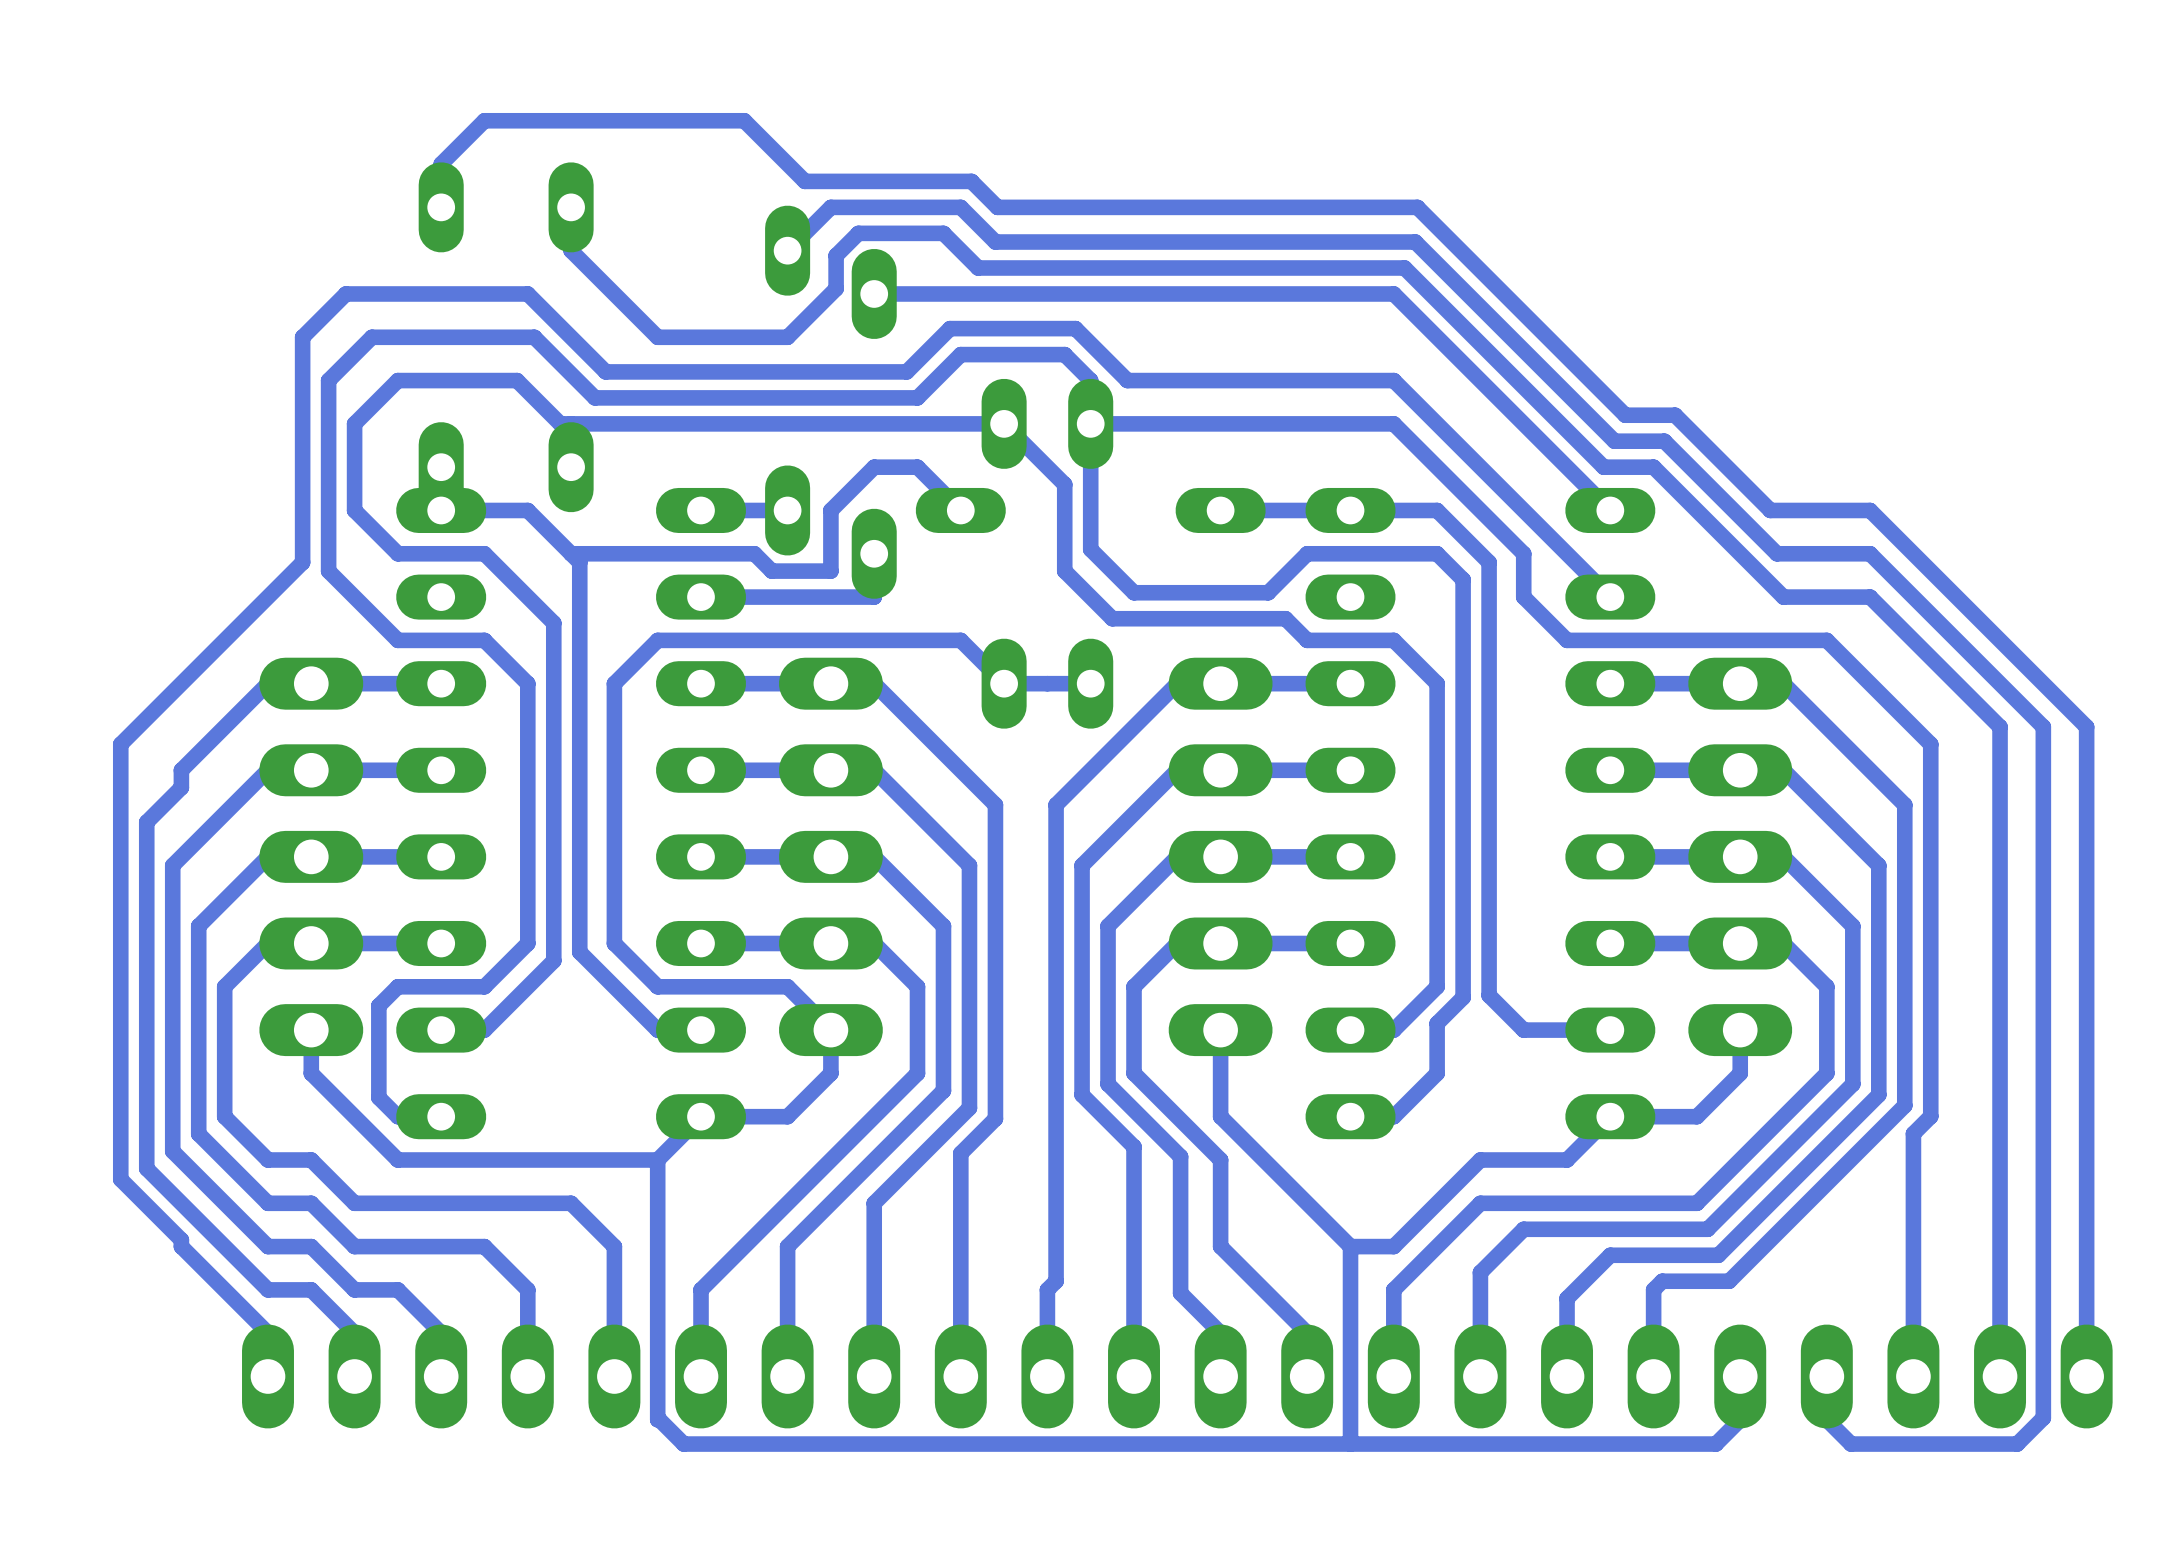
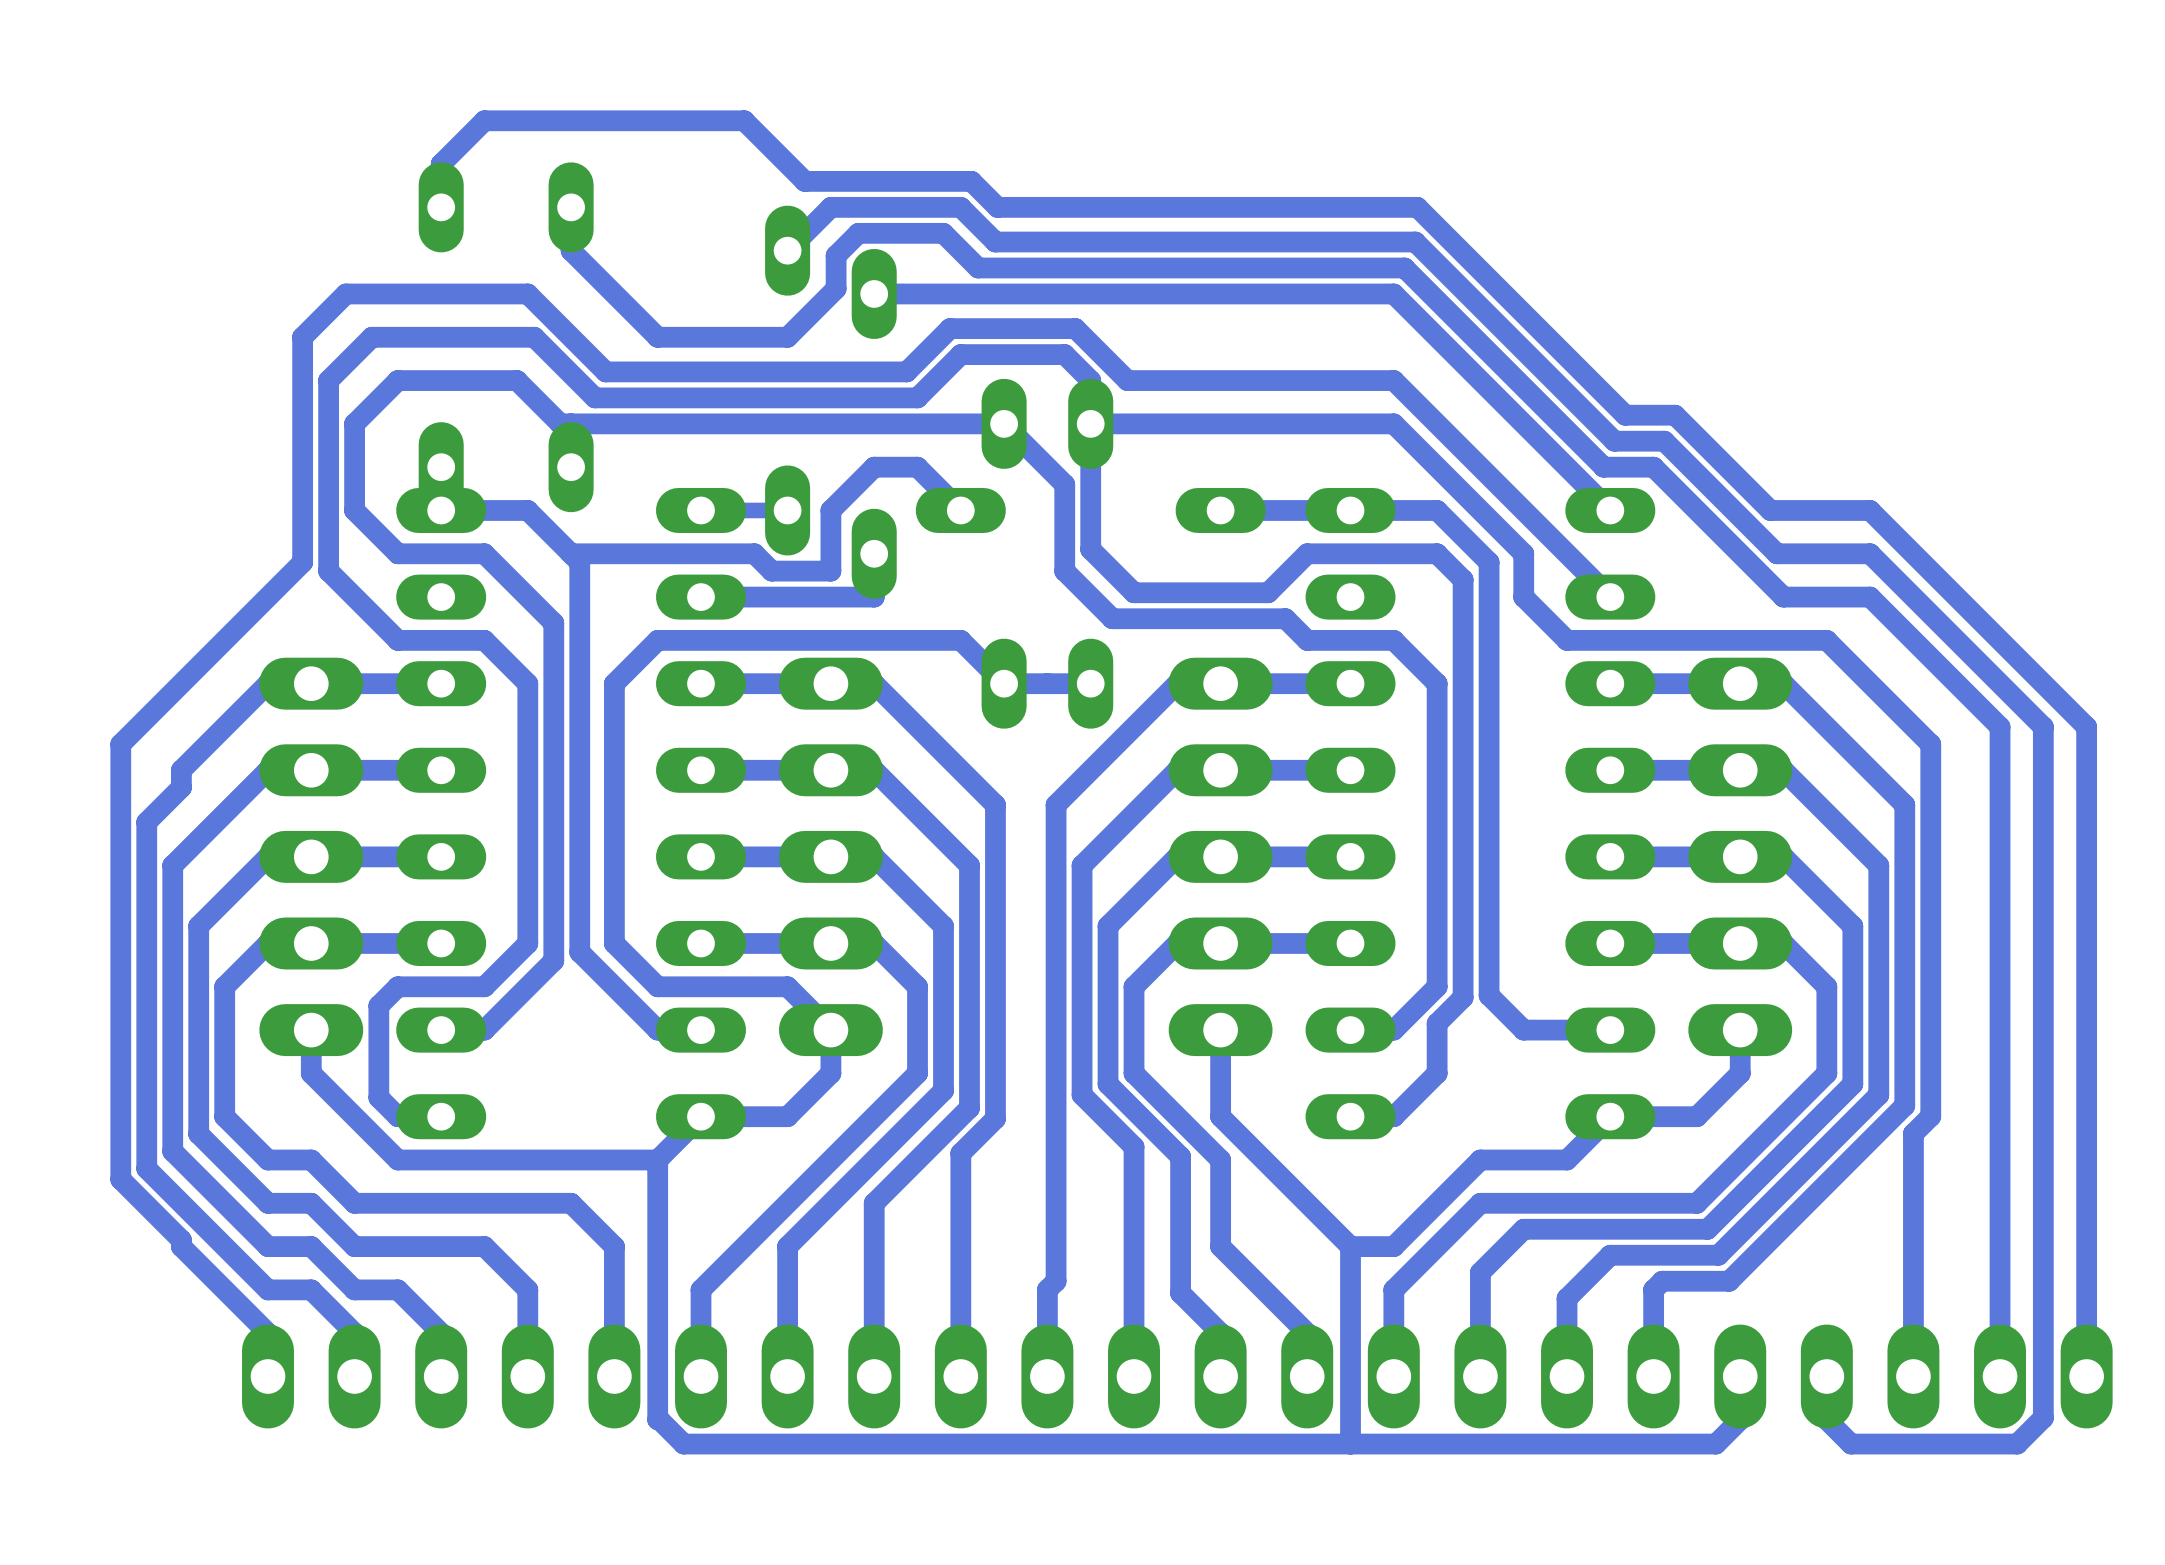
track width: thin (441, 207) (441, 164) (484, 120) (744, 120) (804, 181) (971, 181) (997, 207) (1417, 207) (1625, 415) (1675, 415) (1770, 510) (1870, 510) (2086, 726) (2086, 1376) -> thick (441, 207) (441, 164) (484, 120) (744, 120) (804, 181) (971, 181) (997, 207) (1417, 207) (1625, 415) (1675, 415) (1770, 510) (1870, 510) (2086, 726) (2086, 1376)
track width: thin (571, 207) (571, 250) (657, 337) (787, 337) (836, 288) (836, 255) (858, 233) (943, 233) (978, 267) (1404, 267) (1603, 467) (1653, 467) (1783, 597) (1870, 597) (2000, 726) (2000, 1376) -> thick (571, 207) (571, 250) (657, 337) (787, 337) (836, 288) (836, 255) (858, 233) (943, 233) (978, 267) (1404, 267) (1603, 467) (1653, 467) (1783, 597) (1870, 597) (2000, 726) (2000, 1376)
track width: thin (787, 250) (830, 207) (960, 207) (995, 242) (1415, 242) (1614, 441) (1664, 441) (1776, 553) (1870, 553) (2043, 726) (2043, 1417) (2017, 1444) (1851, 1444) (1826, 1419) (1826, 1376) -> thick (787, 250) (830, 207) (960, 207) (995, 242) (1415, 242) (1614, 441) (1664, 441) (1776, 553) (1870, 553) (2043, 726) (2043, 1417) (2017, 1444) (1851, 1444) (1826, 1419) (1826, 1376)
track width: thin (874, 293) (1393, 293) (1610, 510) -> thick (874, 293) (1393, 293) (1610, 510)
track width: thin (1090, 423) (1393, 423) (1523, 553) (1523, 597) (1567, 640) (1826, 640) (1930, 744) (1930, 1116) (1913, 1133) (1913, 1376) -> thick (1090, 423) (1393, 423) (1523, 553) (1523, 597) (1567, 640) (1826, 640) (1930, 744) (1930, 1116) (1913, 1133) (1913, 1376)
track width: thin (441, 467) (441, 510) (527, 510) (579, 562) (579, 952) (657, 1030) (701, 1030) -> thick (441, 467) (441, 510) (527, 510) (579, 562) (579, 952) (657, 1030) (701, 1030)
track width: thin (960, 510) (917, 467) (874, 467) (830, 510) (830, 571) (771, 571) (754, 553) (571, 553) -> thick (960, 510) (917, 467) (874, 467) (830, 510) (830, 571) (771, 571) (754, 553) (571, 553)
track width: thin (1220, 510) (1437, 510) (1489, 562) (1489, 995) (1523, 1030) (1610, 1030) -> thick (1220, 510) (1437, 510) (1489, 562) (1489, 995) (1523, 1030) (1610, 1030)
track width: thin (874, 553) (874, 597) (701, 597) -> thick (874, 553) (874, 597) (701, 597)
track width: thin (1610, 597) (1393, 380) (1127, 380) (1075, 328) (950, 328) (906, 371) (605, 371) (527, 293) (345, 293) (302, 337) (302, 562) (120, 744) (120, 1179) (181, 1240) (181, 1246) (267, 1333) (267, 1376) -> thick (1610, 597) (1393, 380) (1127, 380) (1075, 328) (950, 328) (906, 371) (605, 371) (527, 293) (345, 293) (302, 337) (302, 562) (120, 744) (120, 1179) (181, 1240) (181, 1246) (267, 1333) (267, 1376)
track width: thin (441, 683) (267, 683) (181, 770) (181, 787) (146, 822) (146, 1168) (267, 1289) (311, 1289) (354, 1333) (354, 1376) -> thick (441, 683) (267, 683) (181, 770) (181, 787) (146, 822) (146, 1168) (267, 1289) (311, 1289) (354, 1333) (354, 1376)
track width: thin (701, 683) (874, 683) (995, 804) (995, 1118) (960, 1153) (960, 1376) -> thick (701, 683) (874, 683) (995, 804) (995, 1118) (960, 1153) (960, 1376)
track width: thin (1090, 683) (1004, 683) (960, 640) (657, 640) (614, 683) (614, 943) (657, 986) (787, 986) (830, 1030) (830, 1073) (787, 1116) (701, 1116) (657, 1159) -> thick (1090, 683) (1004, 683) (960, 640) (657, 640) (614, 683) (614, 943) (657, 986) (787, 986) (830, 1030) (830, 1073) (787, 1116) (701, 1116) (657, 1159)
track width: thin (1350, 683) (1177, 683) (1056, 804) (1056, 1281) (1047, 1289) (1047, 1376) -> thick (1350, 683) (1177, 683) (1056, 804) (1056, 1281) (1047, 1289) (1047, 1376)
track width: thin (1610, 683) (1783, 683) (1904, 804) (1904, 1105) (1729, 1281) (1662, 1281) (1653, 1289) (1653, 1376) -> thick (1610, 683) (1783, 683) (1904, 804) (1904, 1105) (1729, 1281) (1662, 1281) (1653, 1289) (1653, 1376)
track width: thin (441, 770) (267, 770) (172, 865) (172, 1151) (267, 1246) (311, 1246) (354, 1289) (397, 1289) (441, 1333) (441, 1376) -> thick (441, 770) (267, 770) (172, 865) (172, 1151) (267, 1246) (311, 1246) (354, 1289) (397, 1289) (441, 1333) (441, 1376)
track width: thin (701, 770) (874, 770) (969, 865) (969, 1108) (874, 1203) (874, 1376) -> thick (701, 770) (874, 770) (969, 865) (969, 1108) (874, 1203) (874, 1376)
track width: thin (1350, 770) (1177, 770) (1082, 865) (1082, 1094) (1134, 1146) (1134, 1376) -> thick (1350, 770) (1177, 770) (1082, 865) (1082, 1094) (1134, 1146) (1134, 1376)
track width: thin (1610, 770) (1783, 770) (1878, 865) (1878, 1094) (1718, 1255) (1610, 1255) (1567, 1298) (1567, 1376) -> thick (1610, 770) (1783, 770) (1878, 865) (1878, 1094) (1718, 1255) (1610, 1255) (1567, 1298) (1567, 1376)
track width: thin (441, 856) (267, 856) (198, 926) (198, 1134) (267, 1203) (311, 1203) (354, 1246) (484, 1246) (527, 1289) (527, 1376) -> thick (441, 856) (267, 856) (198, 926) (198, 1134) (267, 1203) (311, 1203) (354, 1246) (484, 1246) (527, 1289) (527, 1376)
track width: thin (701, 856) (874, 856) (943, 926) (943, 1090) (787, 1246) (787, 1376) -> thick (701, 856) (874, 856) (943, 926) (943, 1090) (787, 1246) (787, 1376)
track width: thin (1350, 856) (1177, 856) (1108, 926) (1108, 1084) (1180, 1156) (1180, 1293) (1220, 1333) (1220, 1376) -> thick (1350, 856) (1177, 856) (1108, 926) (1108, 1084) (1180, 1156) (1180, 1293) (1220, 1333) (1220, 1376)
track width: thin (1610, 856) (1783, 856) (1852, 926) (1852, 1084) (1707, 1229) (1523, 1229) (1480, 1272) (1480, 1376) -> thick (1610, 856) (1783, 856) (1852, 926) (1852, 1084) (1707, 1229) (1523, 1229) (1480, 1272) (1480, 1376)
track width: thin (441, 943) (267, 943) (224, 986) (224, 1116) (267, 1159) (311, 1159) (354, 1203) (571, 1203) (614, 1246) (614, 1376) -> thick (441, 943) (267, 943) (224, 986) (224, 1116) (267, 1159) (311, 1159) (354, 1203) (571, 1203) (614, 1246) (614, 1376)
track width: thin (701, 943) (874, 943) (917, 986) (917, 1073) (701, 1289) (701, 1376) -> thick (701, 943) (874, 943) (917, 986) (917, 1073) (701, 1289) (701, 1376)
track width: thin (1350, 943) (1177, 943) (1134, 986) (1134, 1073) (1220, 1159) (1220, 1246) (1307, 1333) (1307, 1376) -> thick (1350, 943) (1177, 943) (1134, 986) (1134, 1073) (1220, 1159) (1220, 1246) (1307, 1333) (1307, 1376)
track width: thin (1610, 943) (1783, 943) (1826, 986) (1826, 1073) (1696, 1203) (1480, 1203) (1393, 1289) (1393, 1376) -> thick (1610, 943) (1783, 943) (1826, 986) (1826, 1073) (1696, 1203) (1480, 1203) (1393, 1289) (1393, 1376)
track width: thin (311, 1030) (311, 1073) (397, 1159) (657, 1159) -> thick (311, 1030) (311, 1073) (397, 1159) (657, 1159)
track width: thin (1220, 1030) (1220, 1116) (1350, 1246) -> thick (1220, 1030) (1220, 1116) (1350, 1246)
track width: thin (1350, 1030) (1393, 1030) (1437, 986) (1437, 683) (1393, 640) (1307, 640) (1285, 618) (1112, 618) (1064, 571) (1064, 484) (1004, 423) (560, 423) (517, 380) (397, 380) (354, 423) (354, 510) (397, 553) (484, 553) (553, 623) (553, 960) (484, 1030) (441, 1030) -> thick (1350, 1030) (1393, 1030) (1437, 986) (1437, 683) (1393, 640) (1307, 640) (1285, 618) (1112, 618) (1064, 571) (1064, 484) (1004, 423) (560, 423) (517, 380) (397, 380) (354, 423) (354, 510) (397, 553) (484, 553) (553, 623) (553, 960) (484, 1030) (441, 1030)
track width: thin (1740, 1030) (1740, 1073) (1696, 1116) (1610, 1116) (1567, 1159) (1480, 1159) (1393, 1246) (1350, 1246) -> thick (1740, 1030) (1740, 1073) (1696, 1116) (1610, 1116) (1567, 1159) (1480, 1159) (1393, 1246) (1350, 1246)
track width: thin (1350, 1116) (1393, 1116) (1437, 1073) (1437, 1023) (1463, 997) (1463, 579) (1437, 553) (1307, 553) (1268, 592) (1134, 592) (1090, 549) (1090, 380) (1064, 354) (960, 354) (917, 397) (594, 397) (534, 337) (371, 337) (328, 380) (328, 571) (397, 640) (484, 640) (527, 683) (527, 943) (484, 986) (397, 986) (378, 1005) (378, 1097) (397, 1116) (441, 1116) -> thick (1350, 1116) (1393, 1116) (1437, 1073) (1437, 1023) (1463, 997) (1463, 579) (1437, 553) (1307, 553) (1268, 592) (1134, 592) (1090, 549) (1090, 380) (1064, 354) (960, 354) (917, 397) (594, 397) (534, 337) (371, 337) (328, 380) (328, 571) (397, 640) (484, 640) (527, 683) (527, 943) (484, 986) (397, 986) (378, 1005) (378, 1097) (397, 1116) (441, 1116)
track width: thin (657, 1159) (657, 1419) (683, 1444) (1715, 1444) (1740, 1419) (1740, 1376) -> thick (657, 1159) (657, 1419) (683, 1444) (1715, 1444) (1740, 1419) (1740, 1376)
track width: thin (1350, 1246) (1350, 1444) -> thick (1350, 1246) (1350, 1444)

